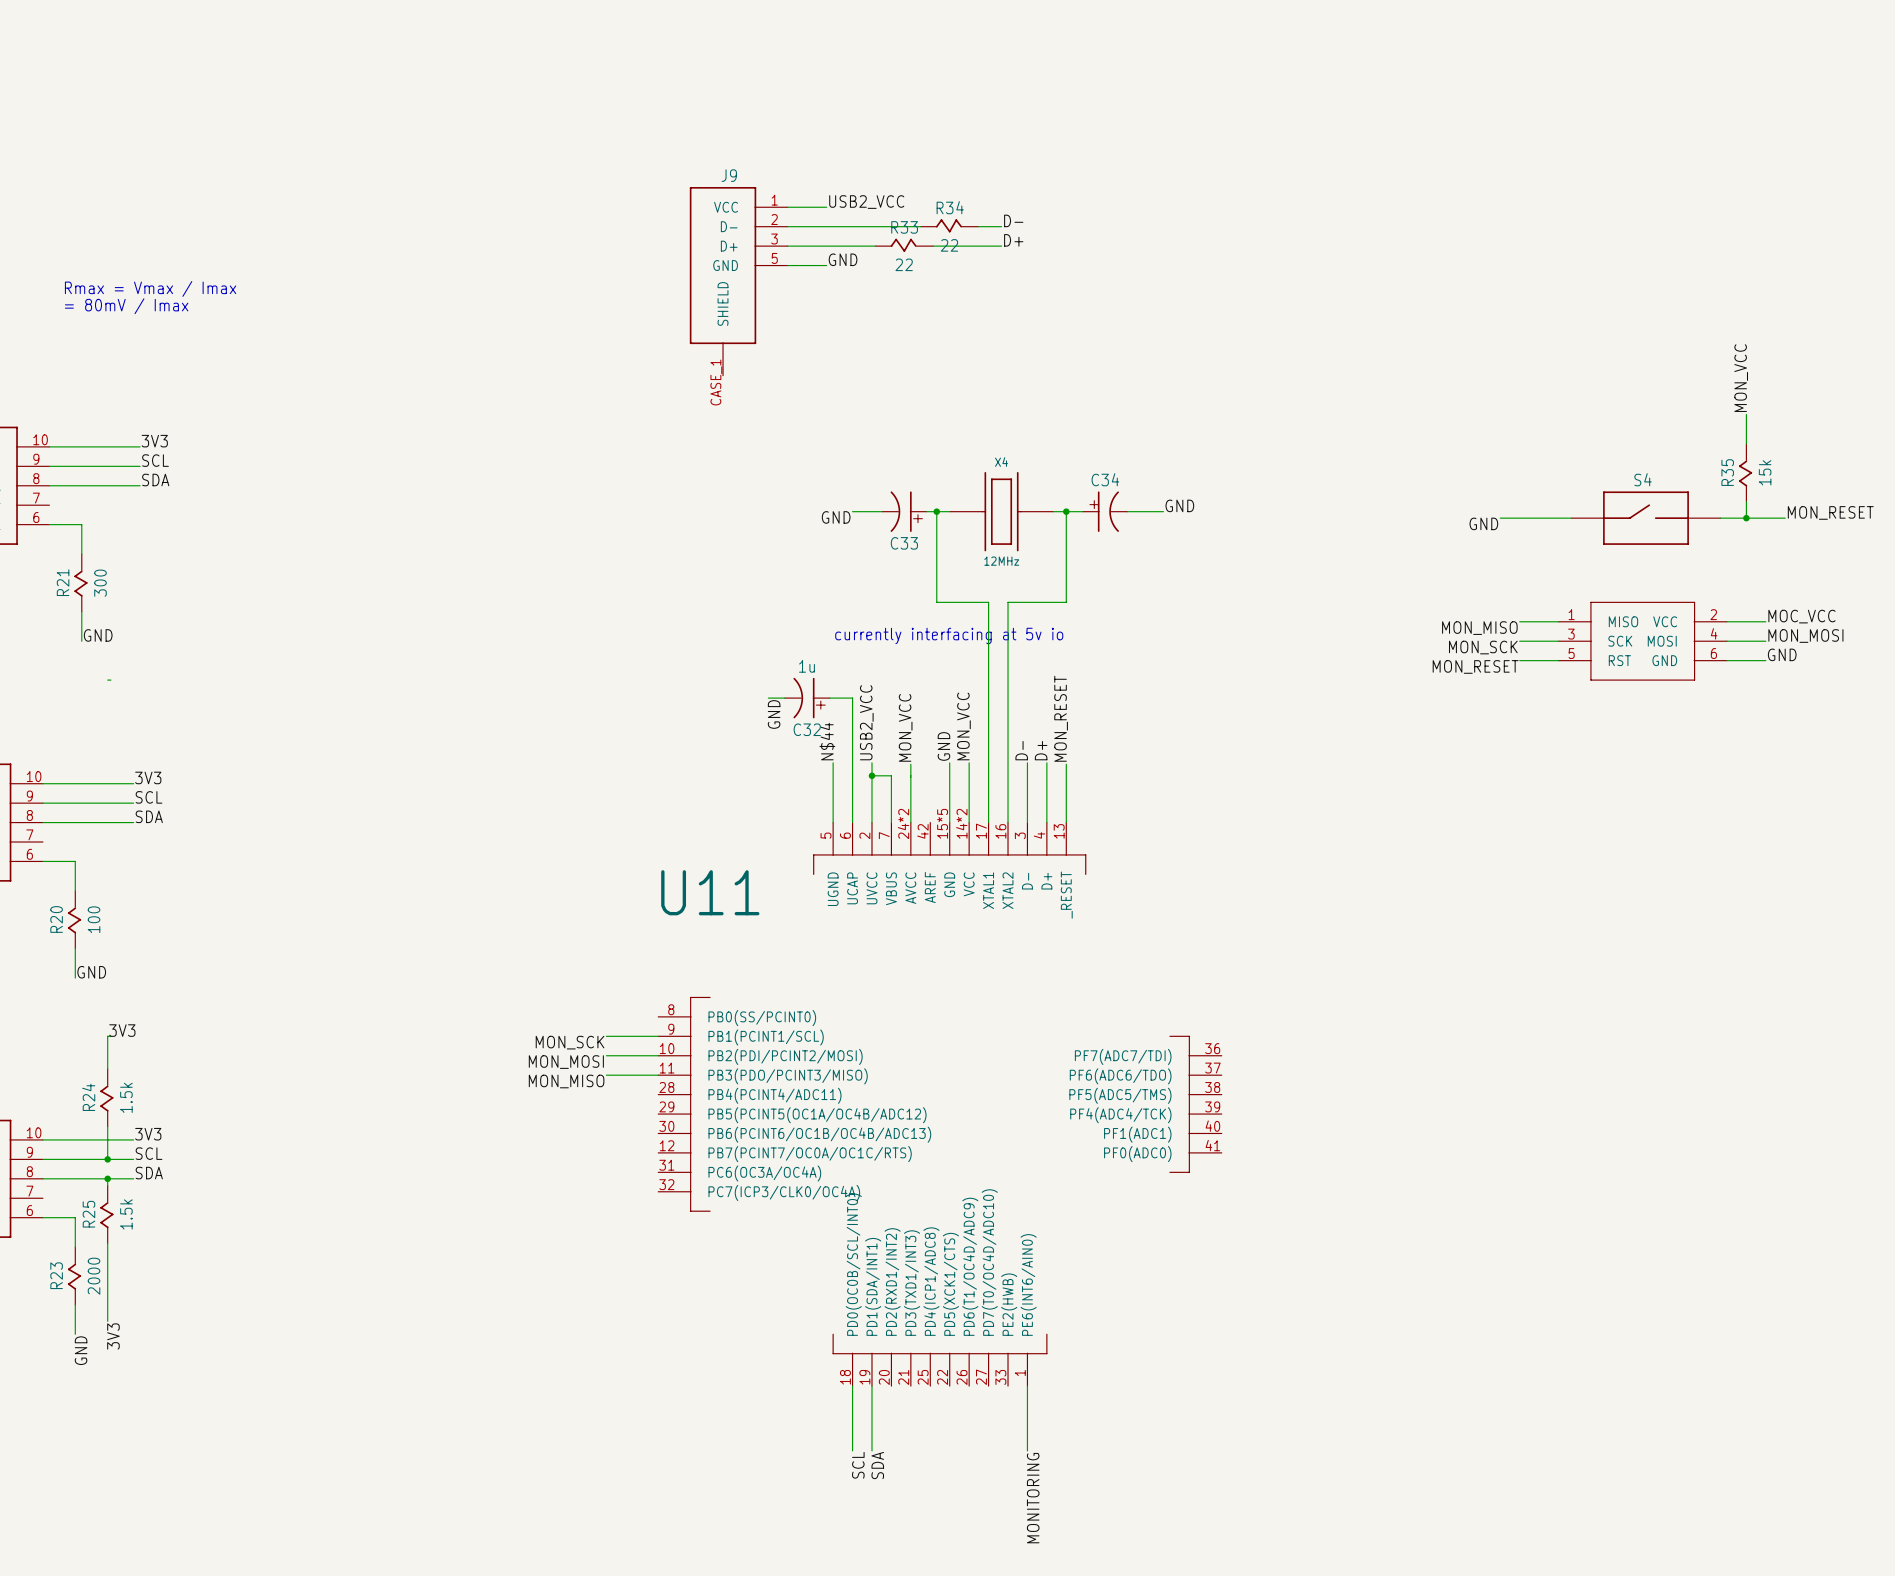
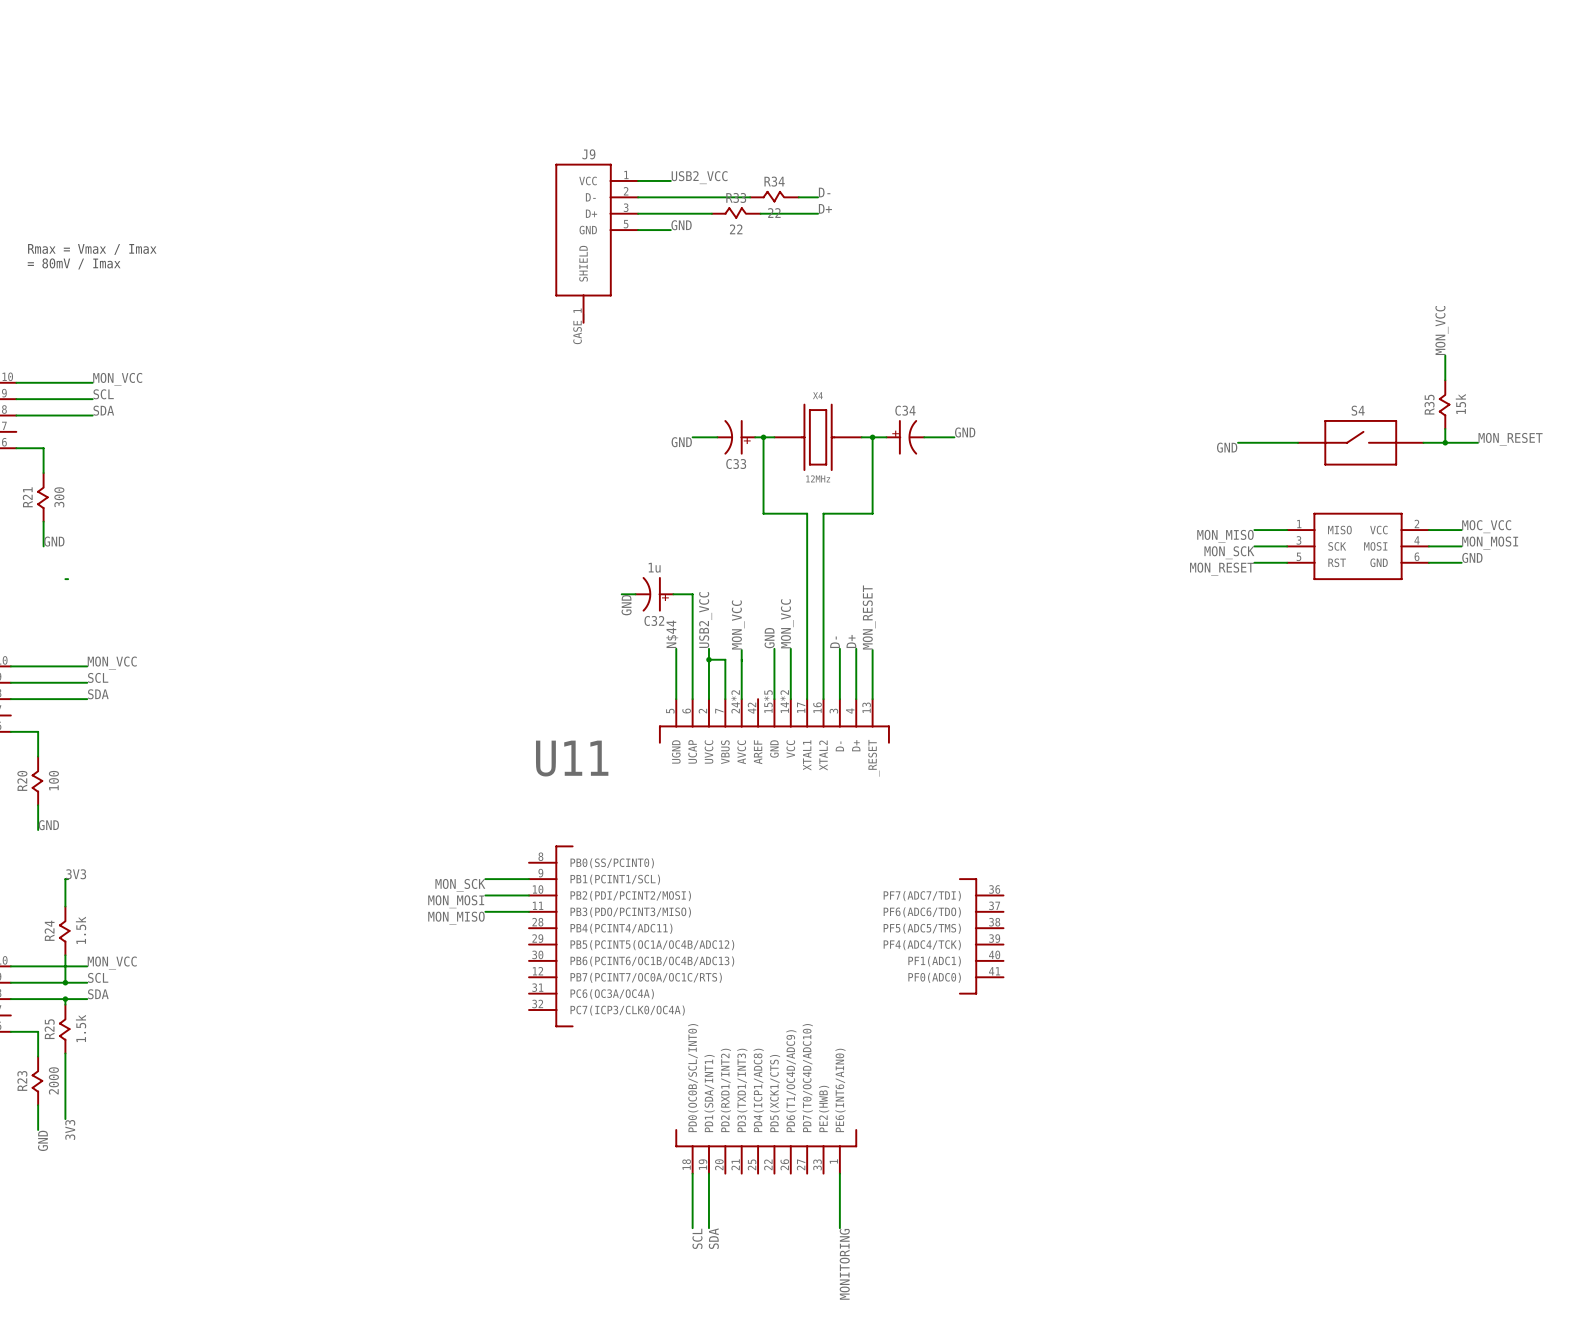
label: 3V3 (154, 441) -> MON_VCC (117, 379)
text: currently interfacing at 5v io (949, 635) -> none
label: 3V3 (148, 777) -> MON_VCC (112, 663)
label: 3V3 (148, 1134) -> MON_VCC (112, 963)

